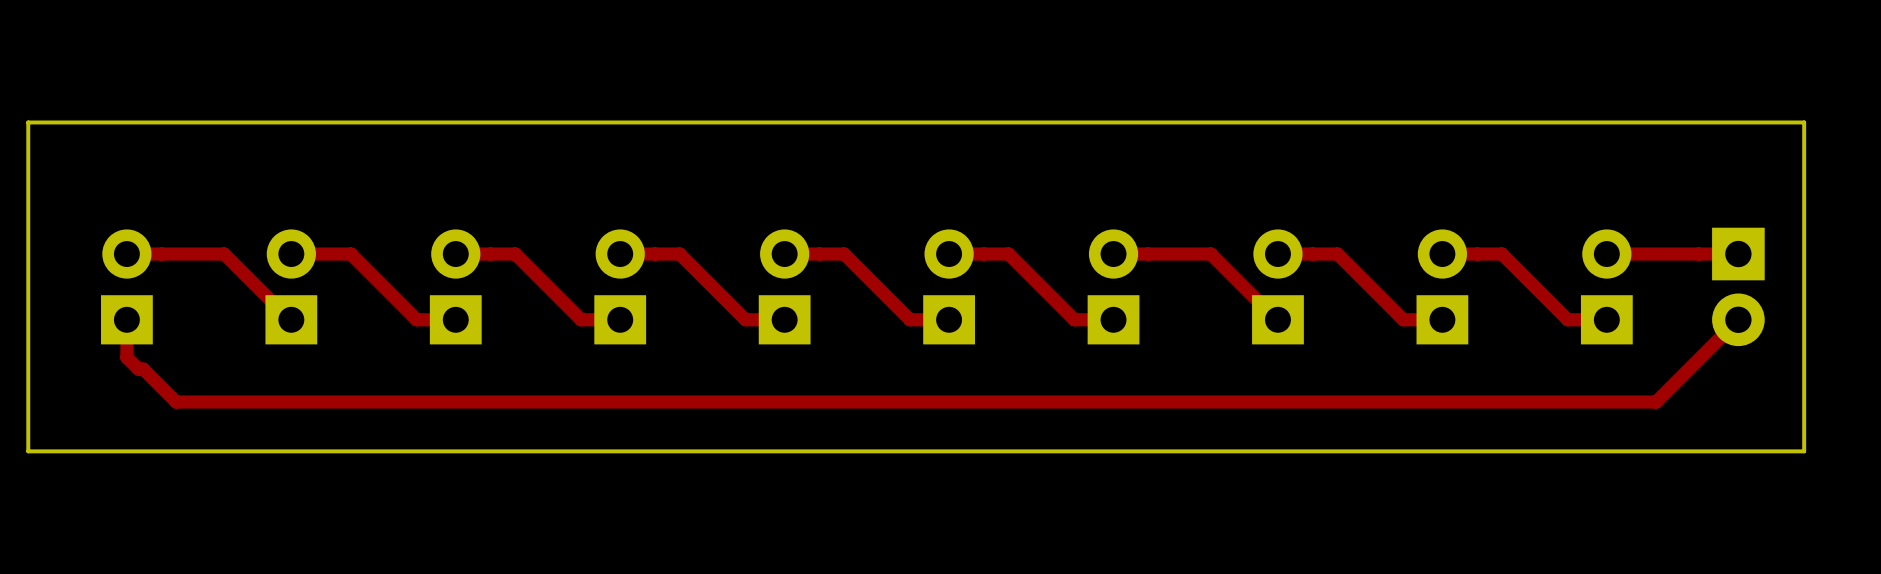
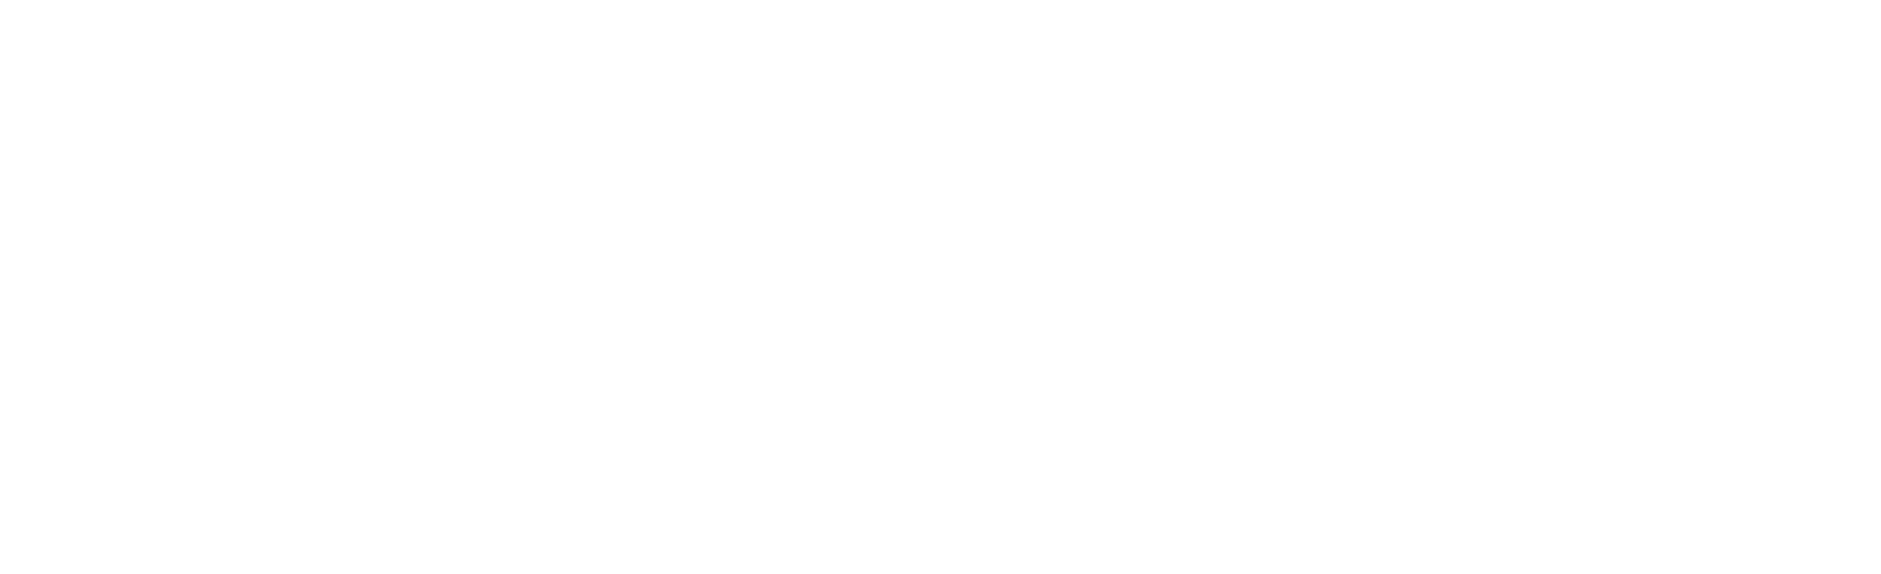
board edge: (1804, 122) (1804, 451) (28, 451) (28, 122) (1804, 122) -> none
top track: (126, 254) (224, 254) (291, 319) -> none
top track: (291, 254) (350, 254) (416, 319) (455, 319) -> none
top track: (455, 254) (515, 254) (581, 319) (620, 319) -> none
top track: (620, 254) (679, 254) (745, 319) (784, 319) -> none
top track: (784, 254) (844, 254) (910, 319) (949, 319) -> none
top track: (949, 254) (1008, 254) (1074, 319) (1113, 319) -> none
top track: (1113, 254) (1210, 254) (1277, 319) -> none
top track: (1277, 254) (1337, 254) (1403, 319) (1442, 319) -> none
top track: (1442, 254) (1502, 254) (1567, 319) (1606, 319) -> none
top track: (1738, 254) (1606, 254) -> none
part: (126, 286) -> none
part: (291, 286) -> none
part: (455, 286) -> none
part: (620, 286) -> none
part: (784, 286) -> none
part: (949, 286) -> none
part: (1113, 286) -> none
part: (1277, 286) -> none
part: (1442, 286) -> none
part: (1606, 286) -> none
part: (1738, 286) -> none
top track: (1738, 319) (1656, 402) (176, 402) (143, 369) (138, 369) (126, 357) (126, 319) -> none

